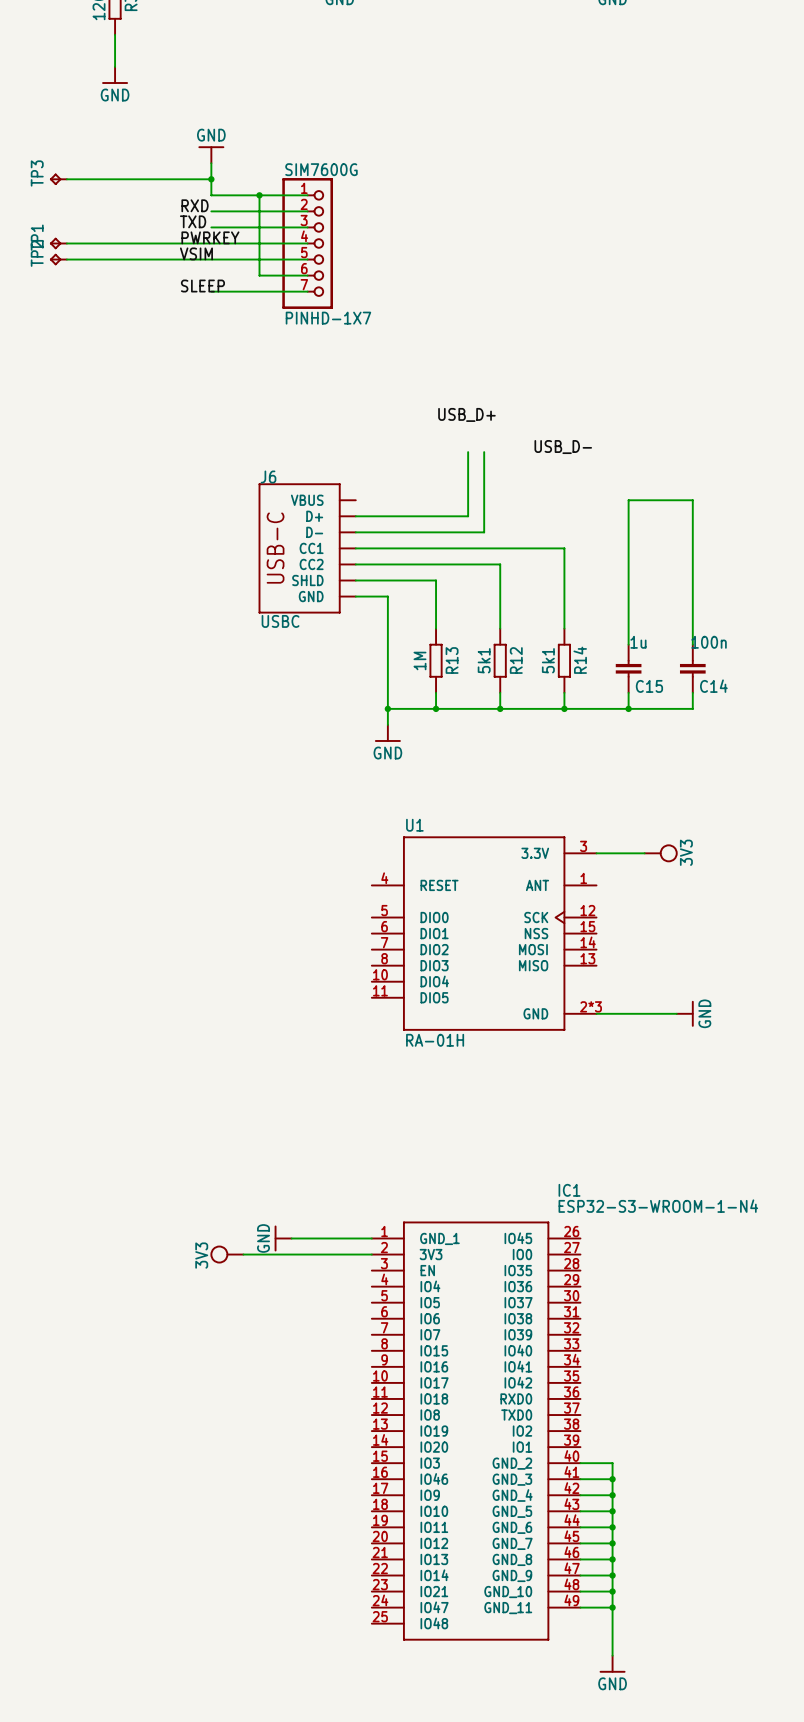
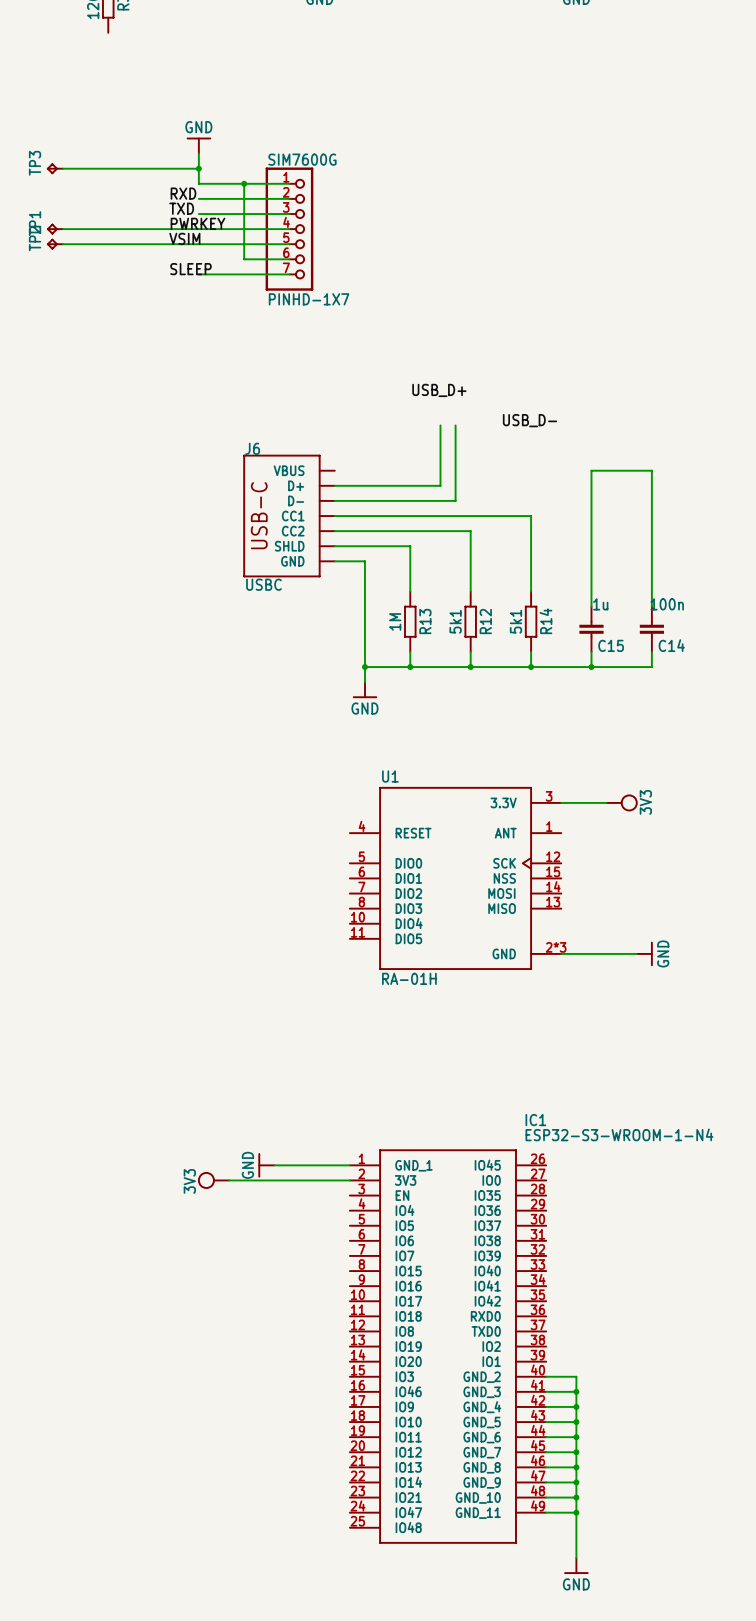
wire: (115, 34) (115, 66) -> none
power symbol: GND (115, 75) -> none

